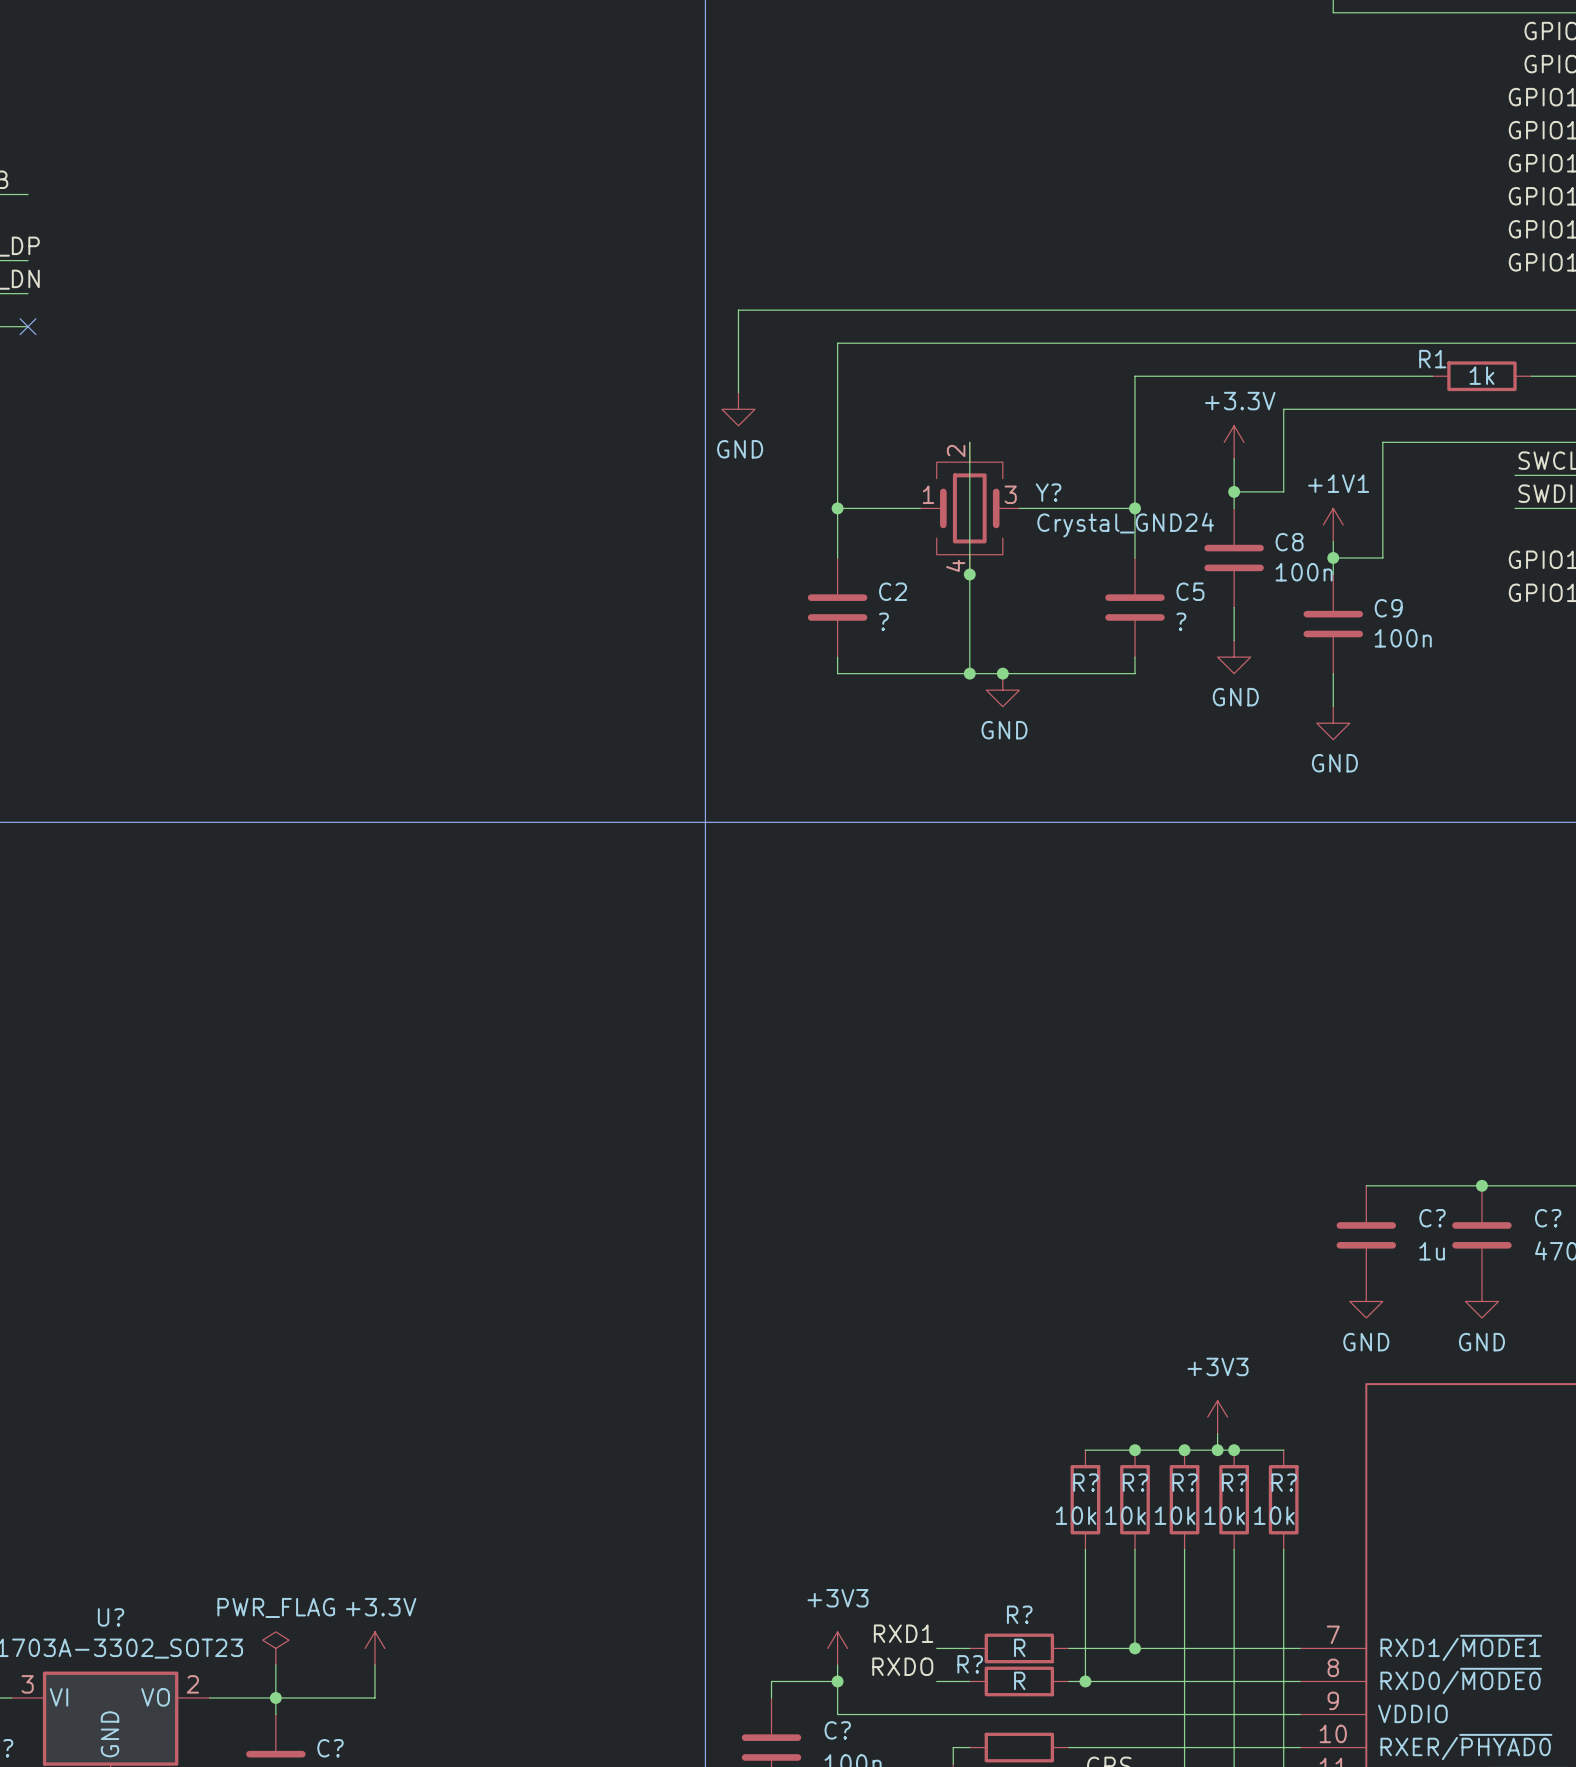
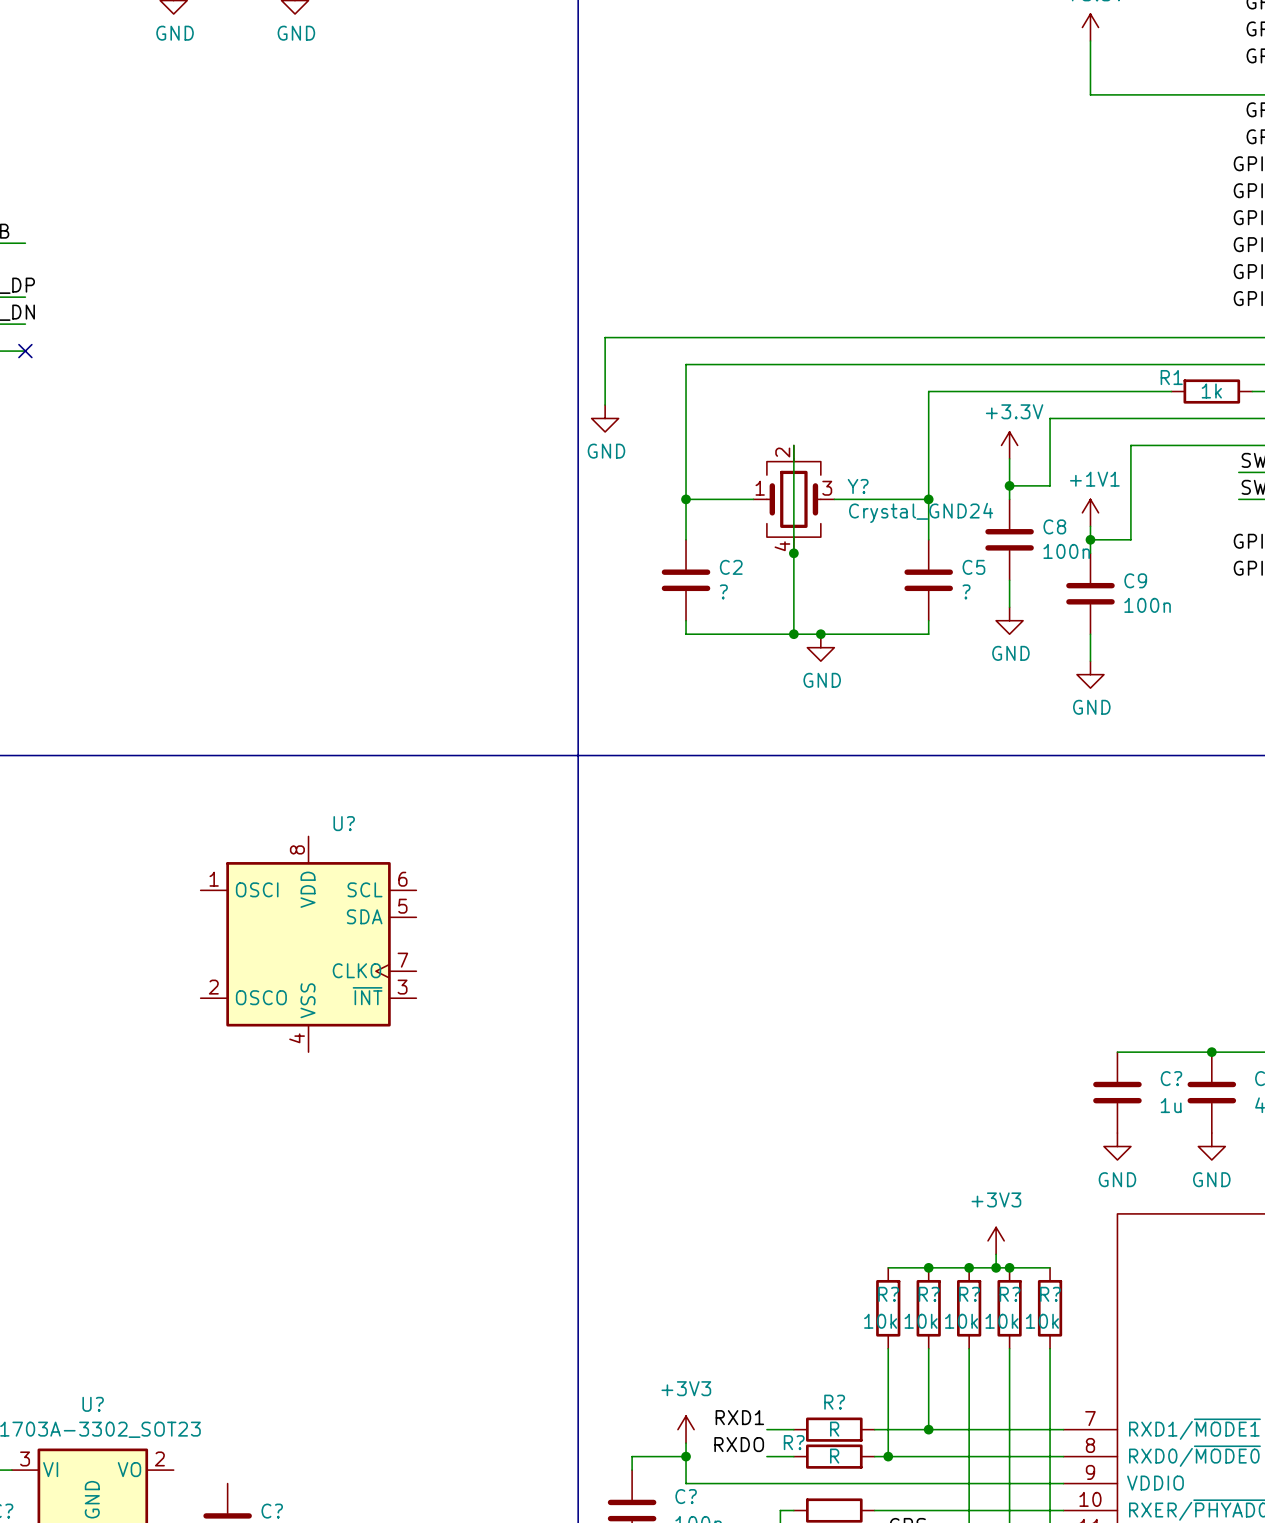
U?: none -> (308, 944)
power symbol: PWR_FLAG (275, 1648) -> none
power symbol: +3.3V (374, 1648) -> none
wire: (275, 1664) (275, 1714) -> none
wire: (374, 1664) (374, 1698) (209, 1698) -> none
junction: (275, 1698) -> none

